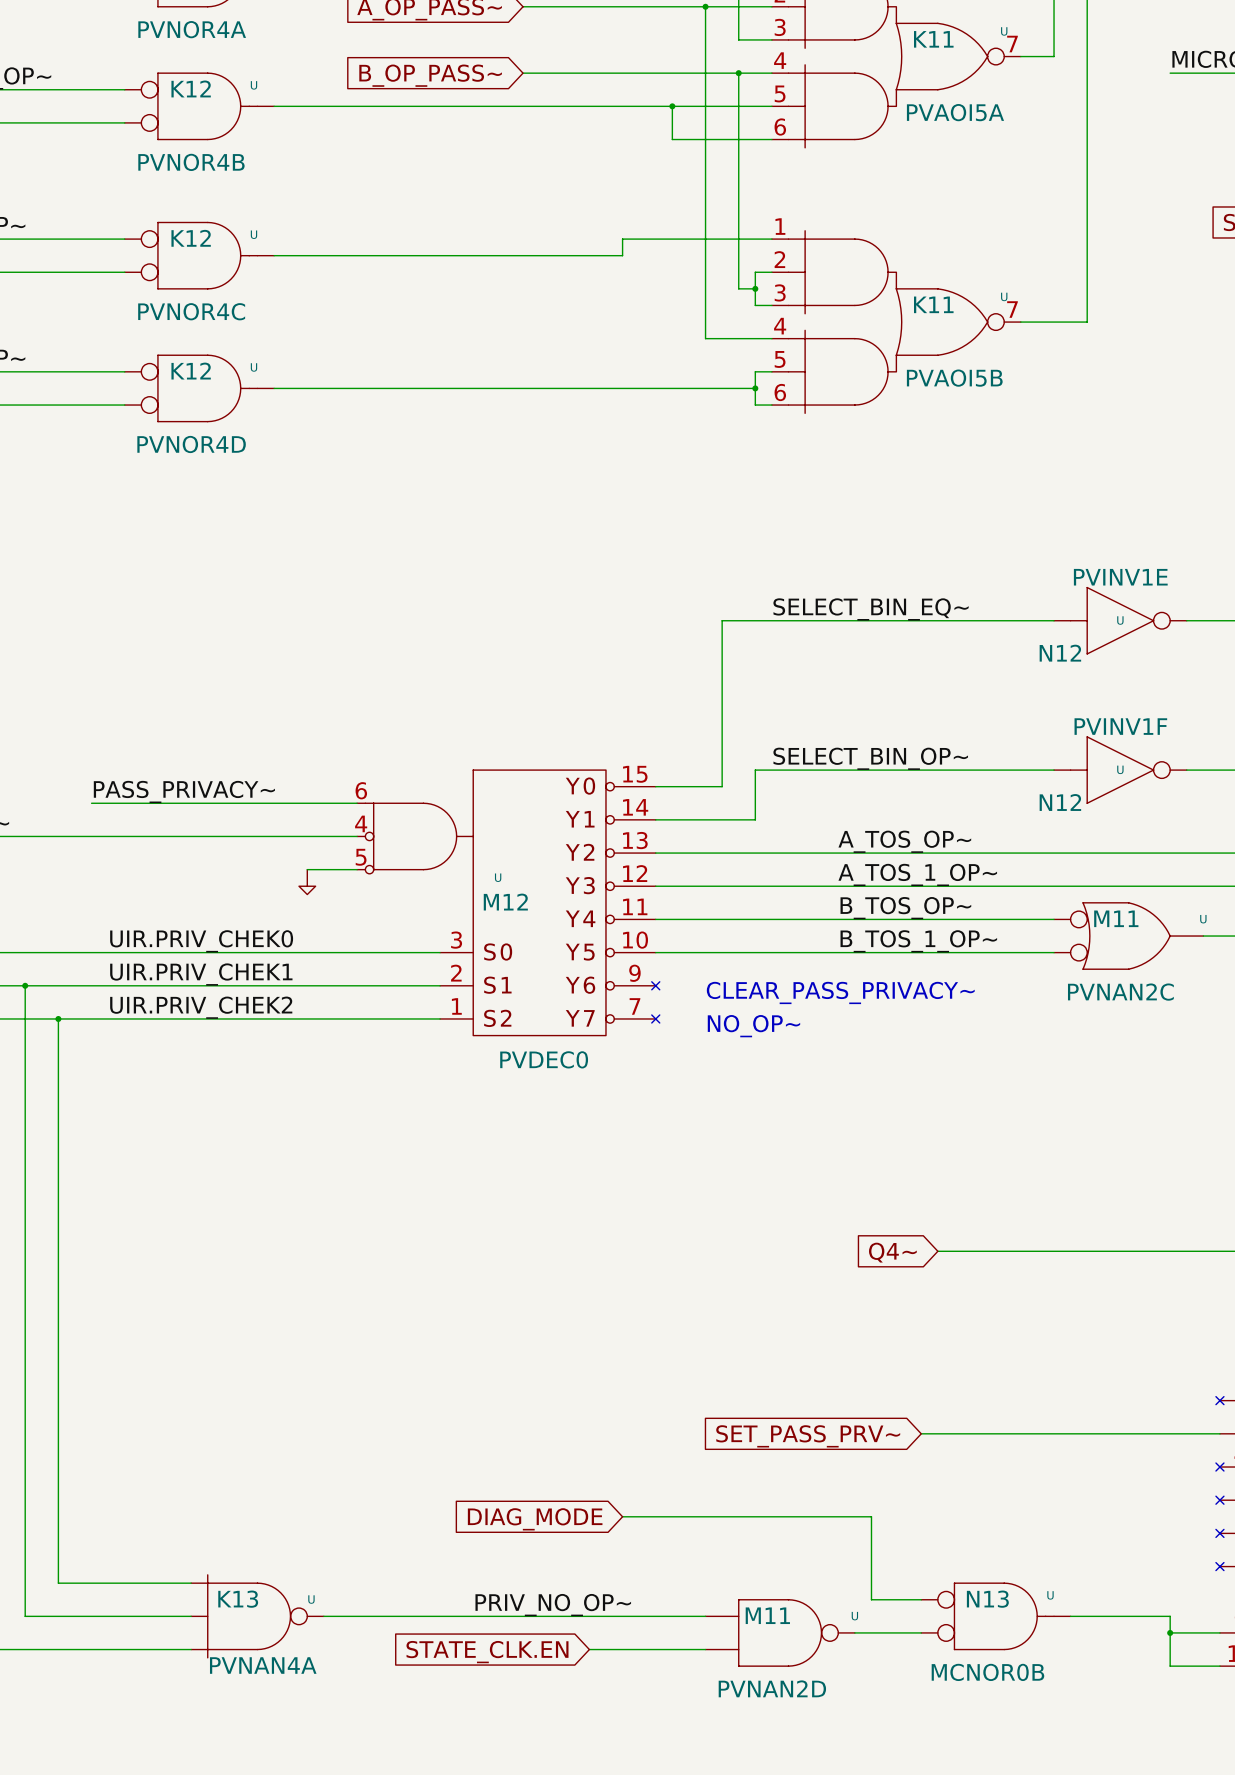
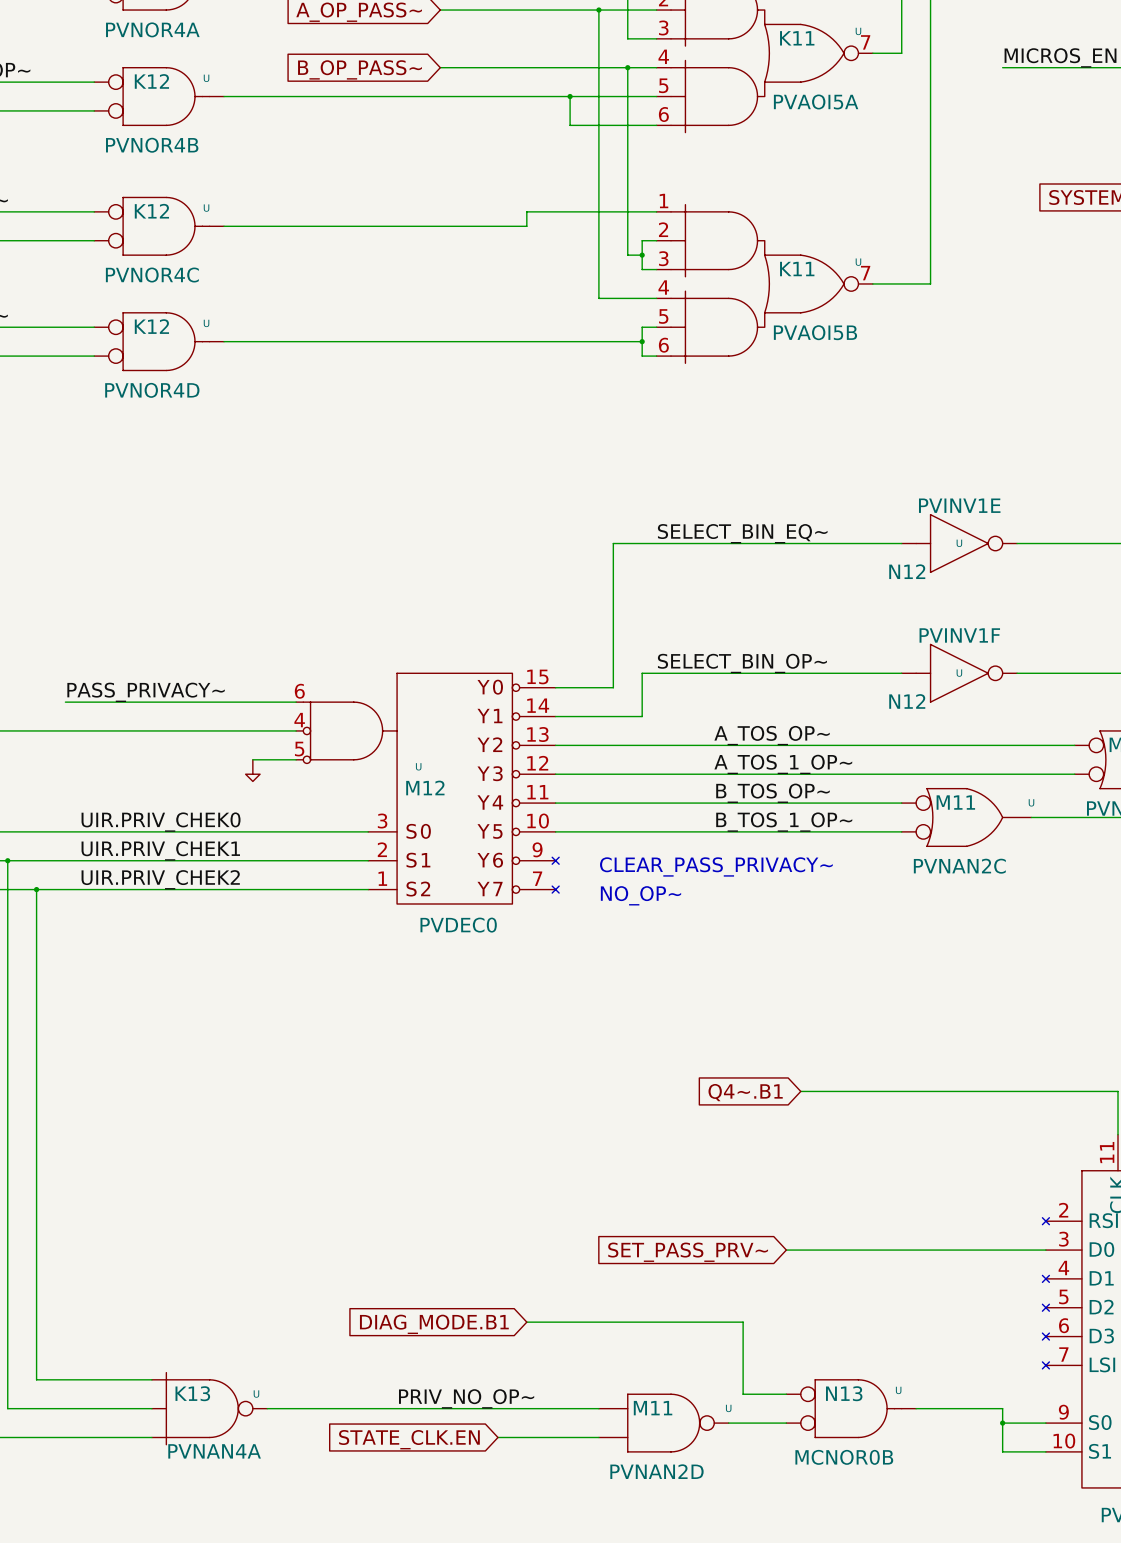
global label: Q4~ (892, 1252) -> Q4~.B1 (745, 1092)
global label: DIAG_MODE (535, 1519) -> DIAG_MODE.B1 (434, 1324)

